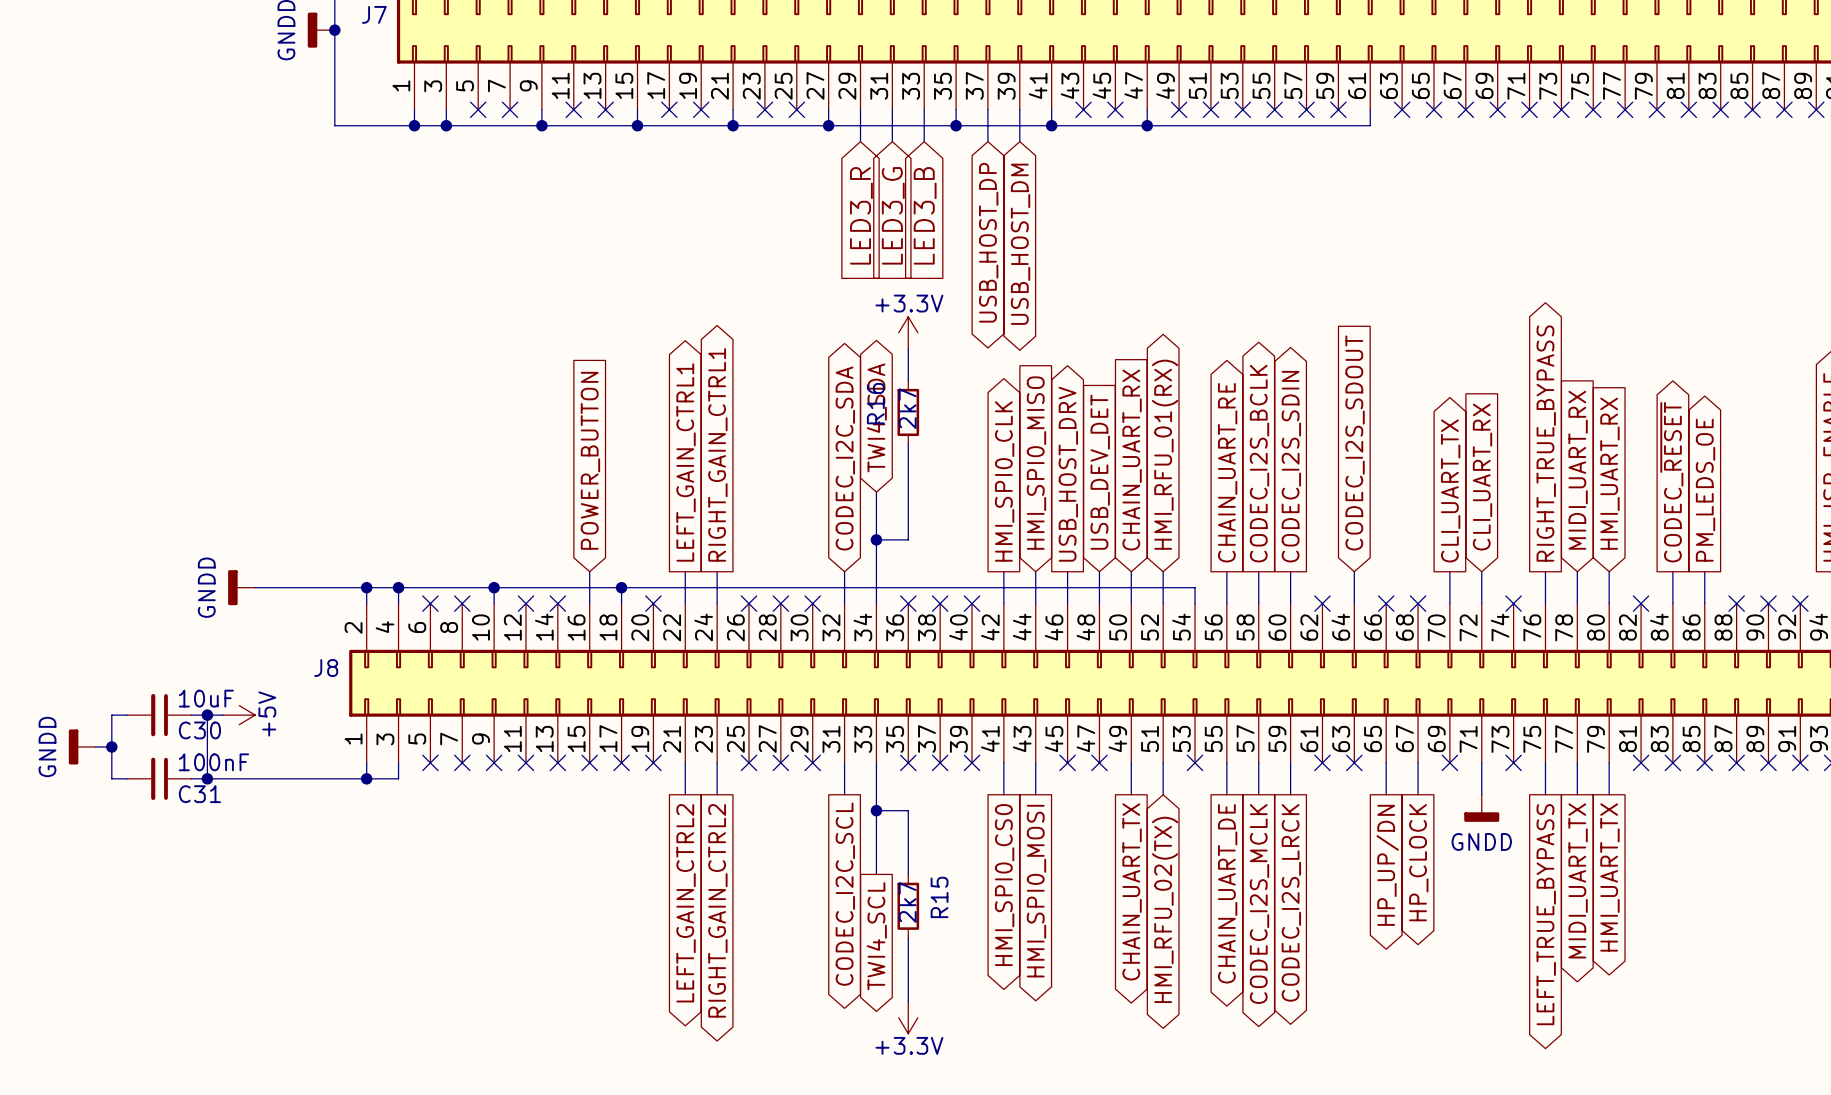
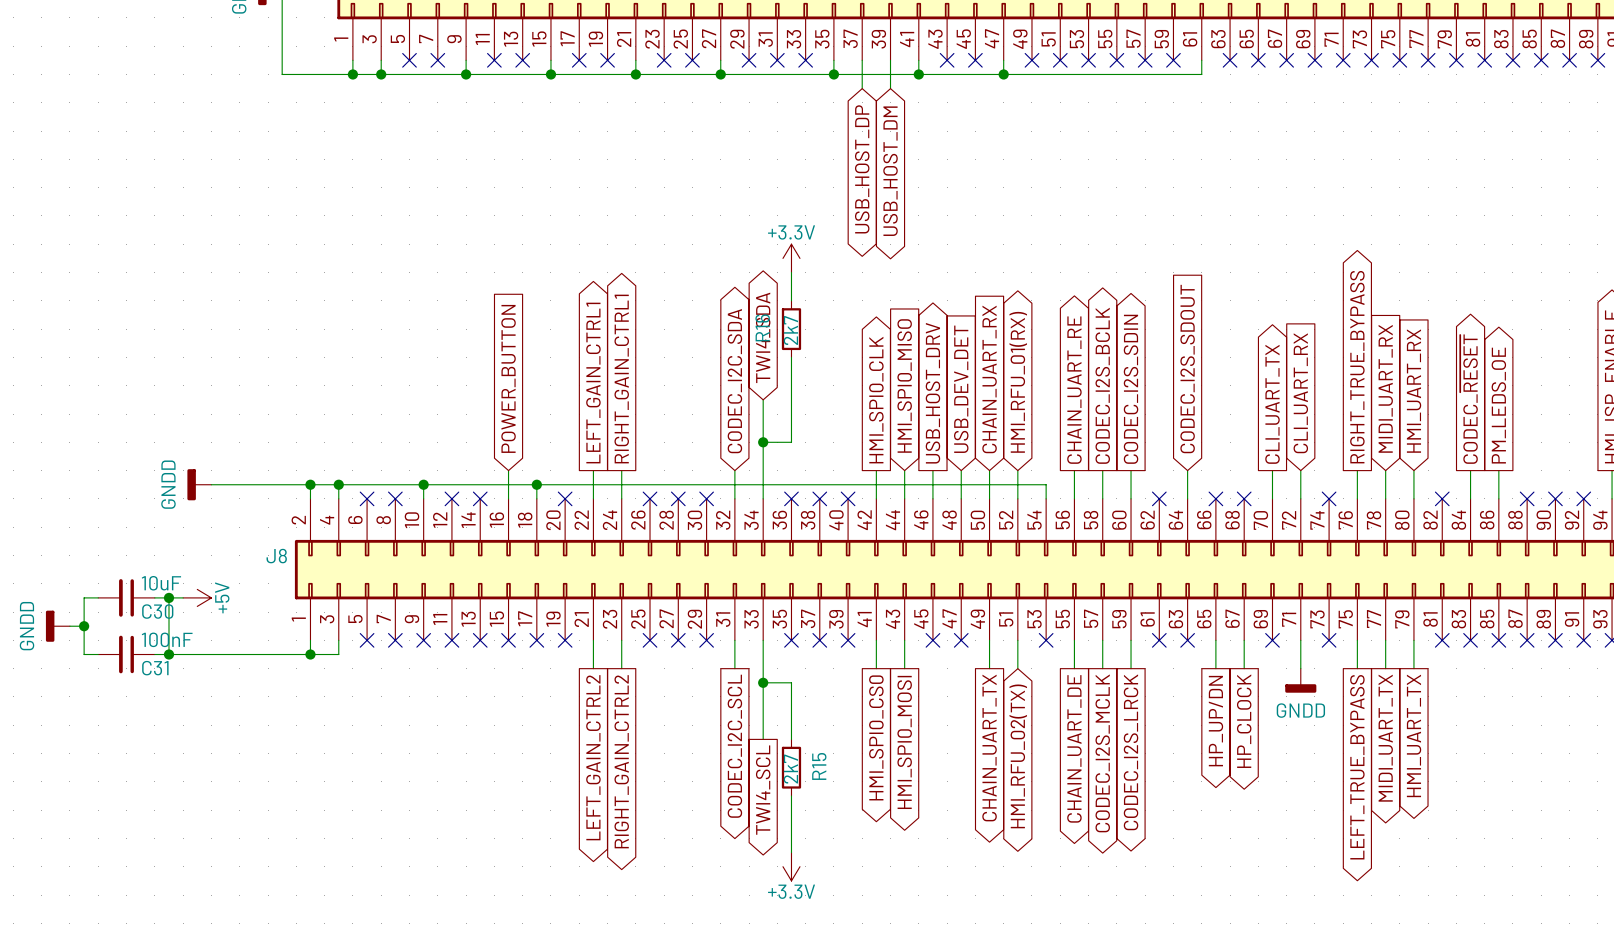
wire: (860, 109) (860, 141) -> none
no-connect mark: none -> (749, 60)
wire: (892, 109) (892, 141) -> none
no-connect mark: none -> (777, 60)
wire: (924, 109) (924, 141) -> none
no-connect mark: none -> (805, 60)
global label: LED3_R (861, 215) -> none
global label: LED3_G (893, 215) -> none
global label: LED3_B (925, 215) -> none

